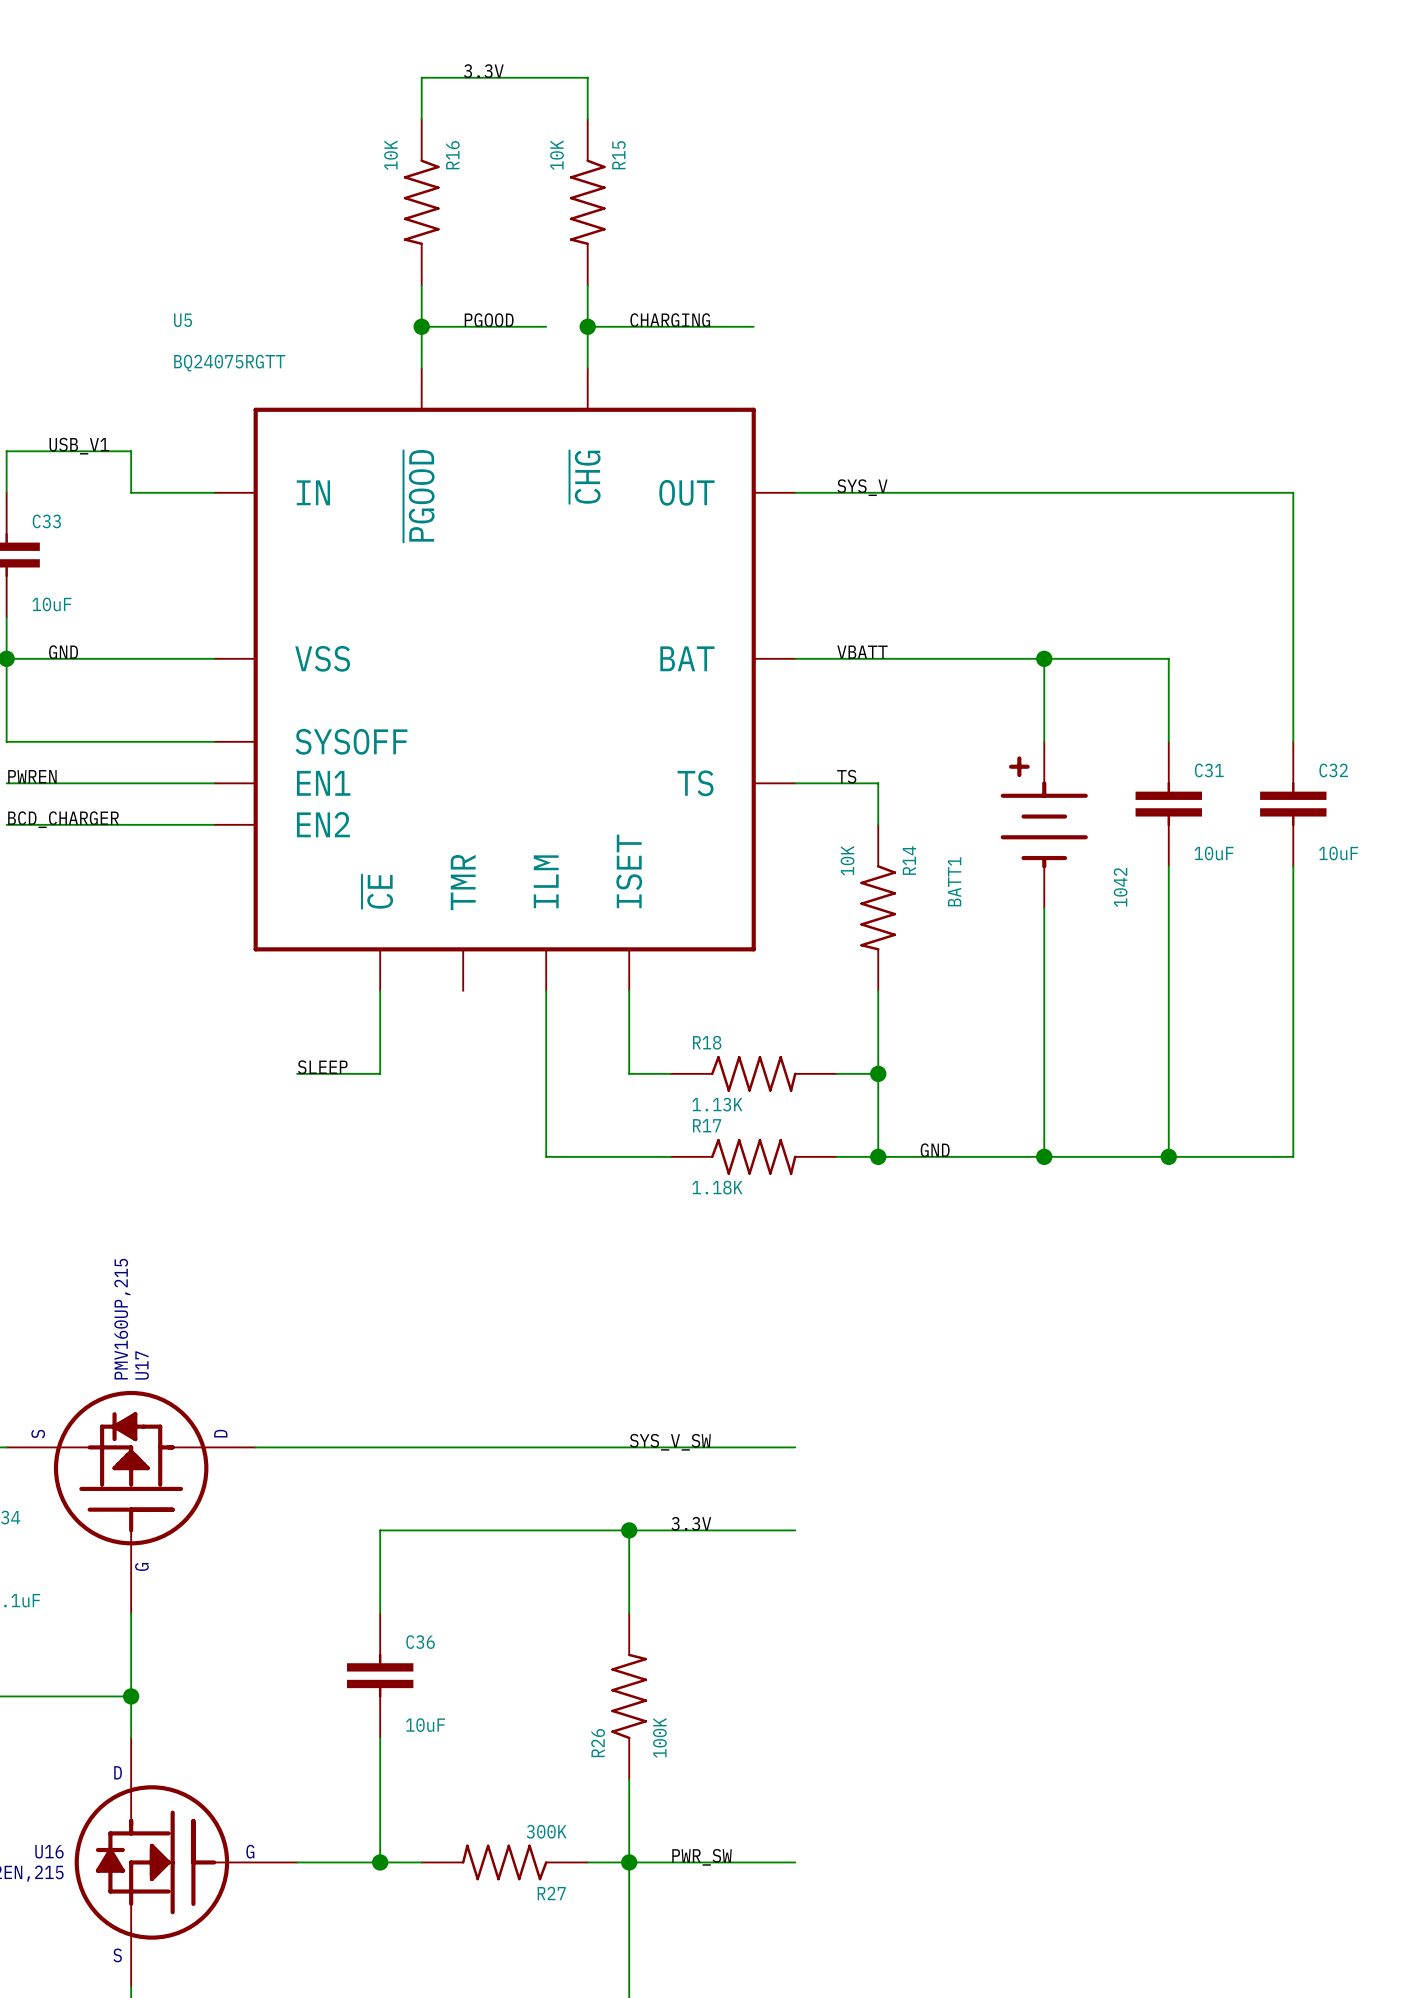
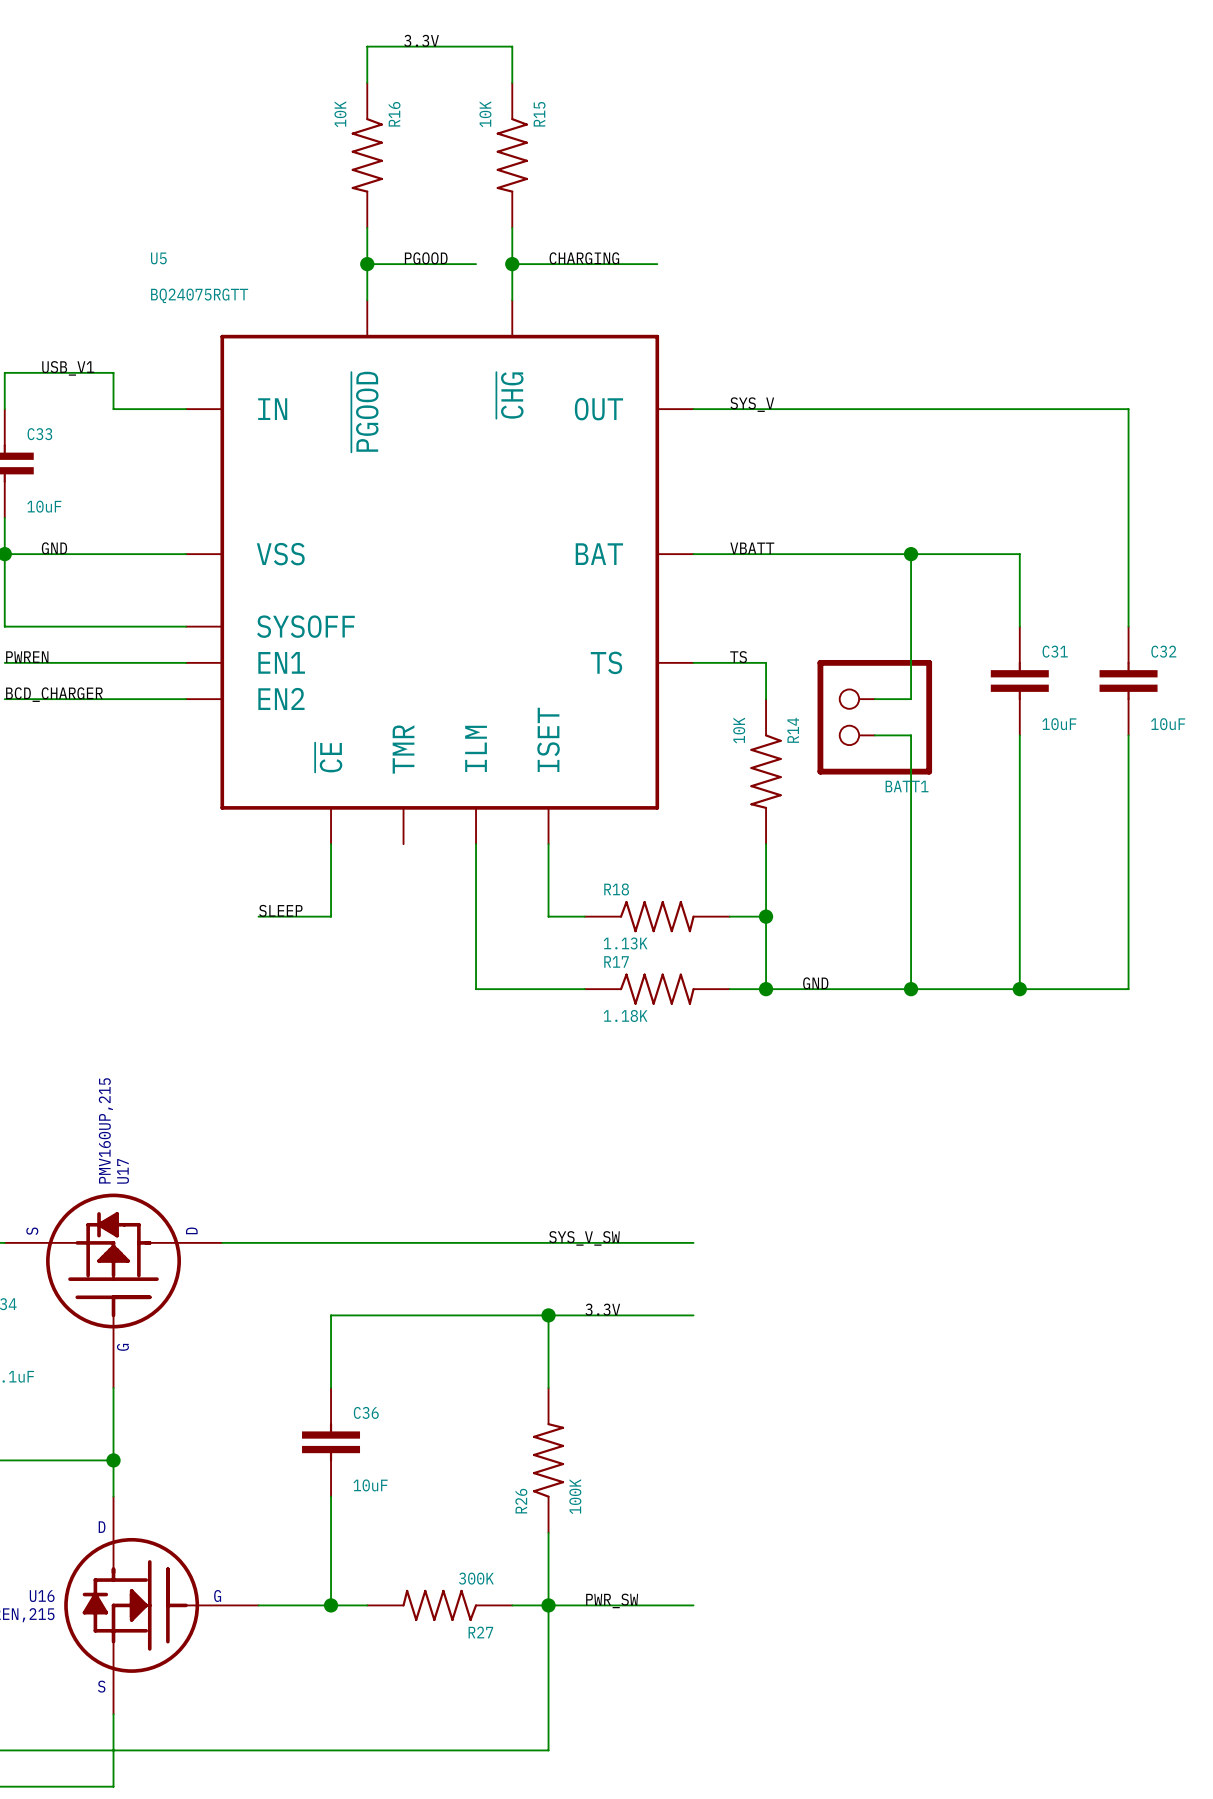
BATT1 symbol: [1000, 741, 1088, 908] -> [817, 659, 933, 775]
wire: none -> (911, 626) (911, 699) (874, 699)
wire: none -> (874, 735) (911, 735) (911, 771)
BATT1 name position: BATT1 (954, 881) -> BATT1 (907, 786)
BATT1 value: 1042 (1120, 887) -> none

